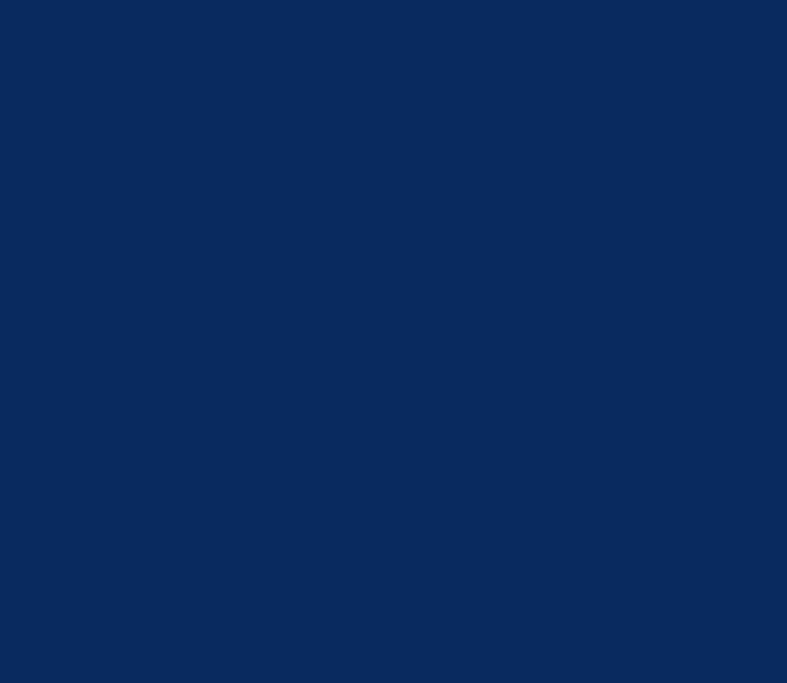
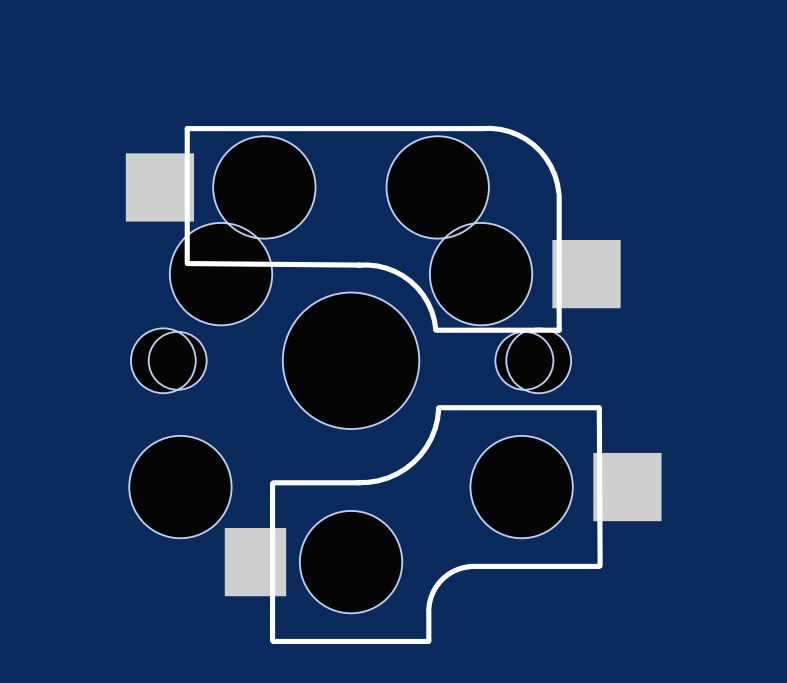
part: none -> (393, 384)

